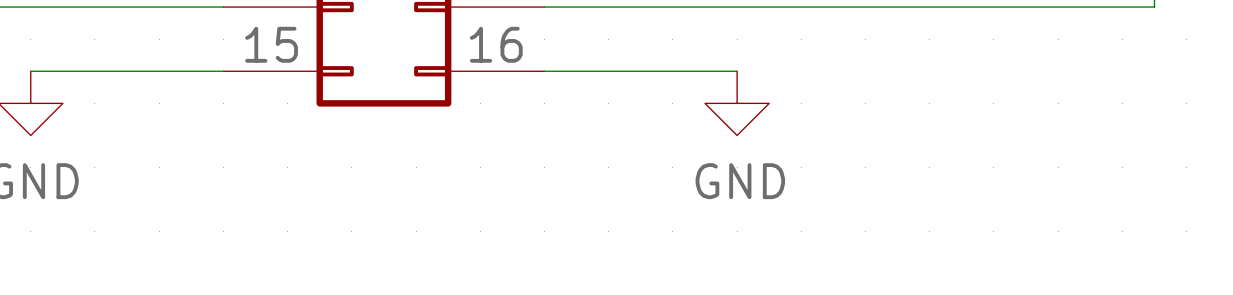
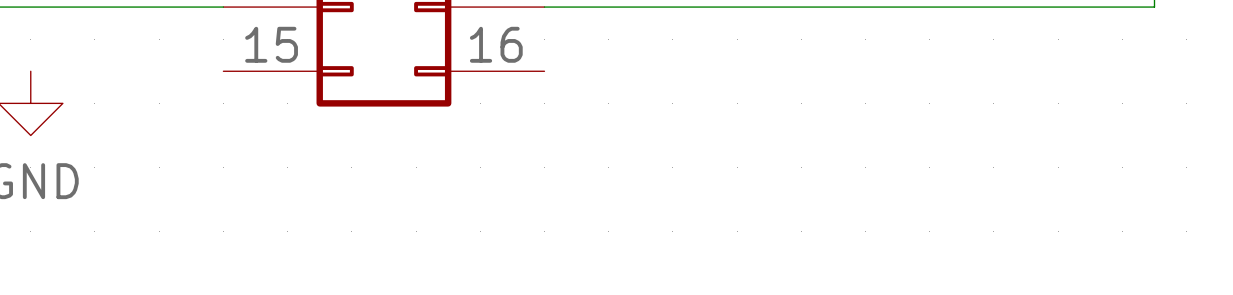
wire: (30, 71) (223, 71) -> none
wire: (544, 71) (737, 71) -> none
power symbol: GND (737, 103) -> none

